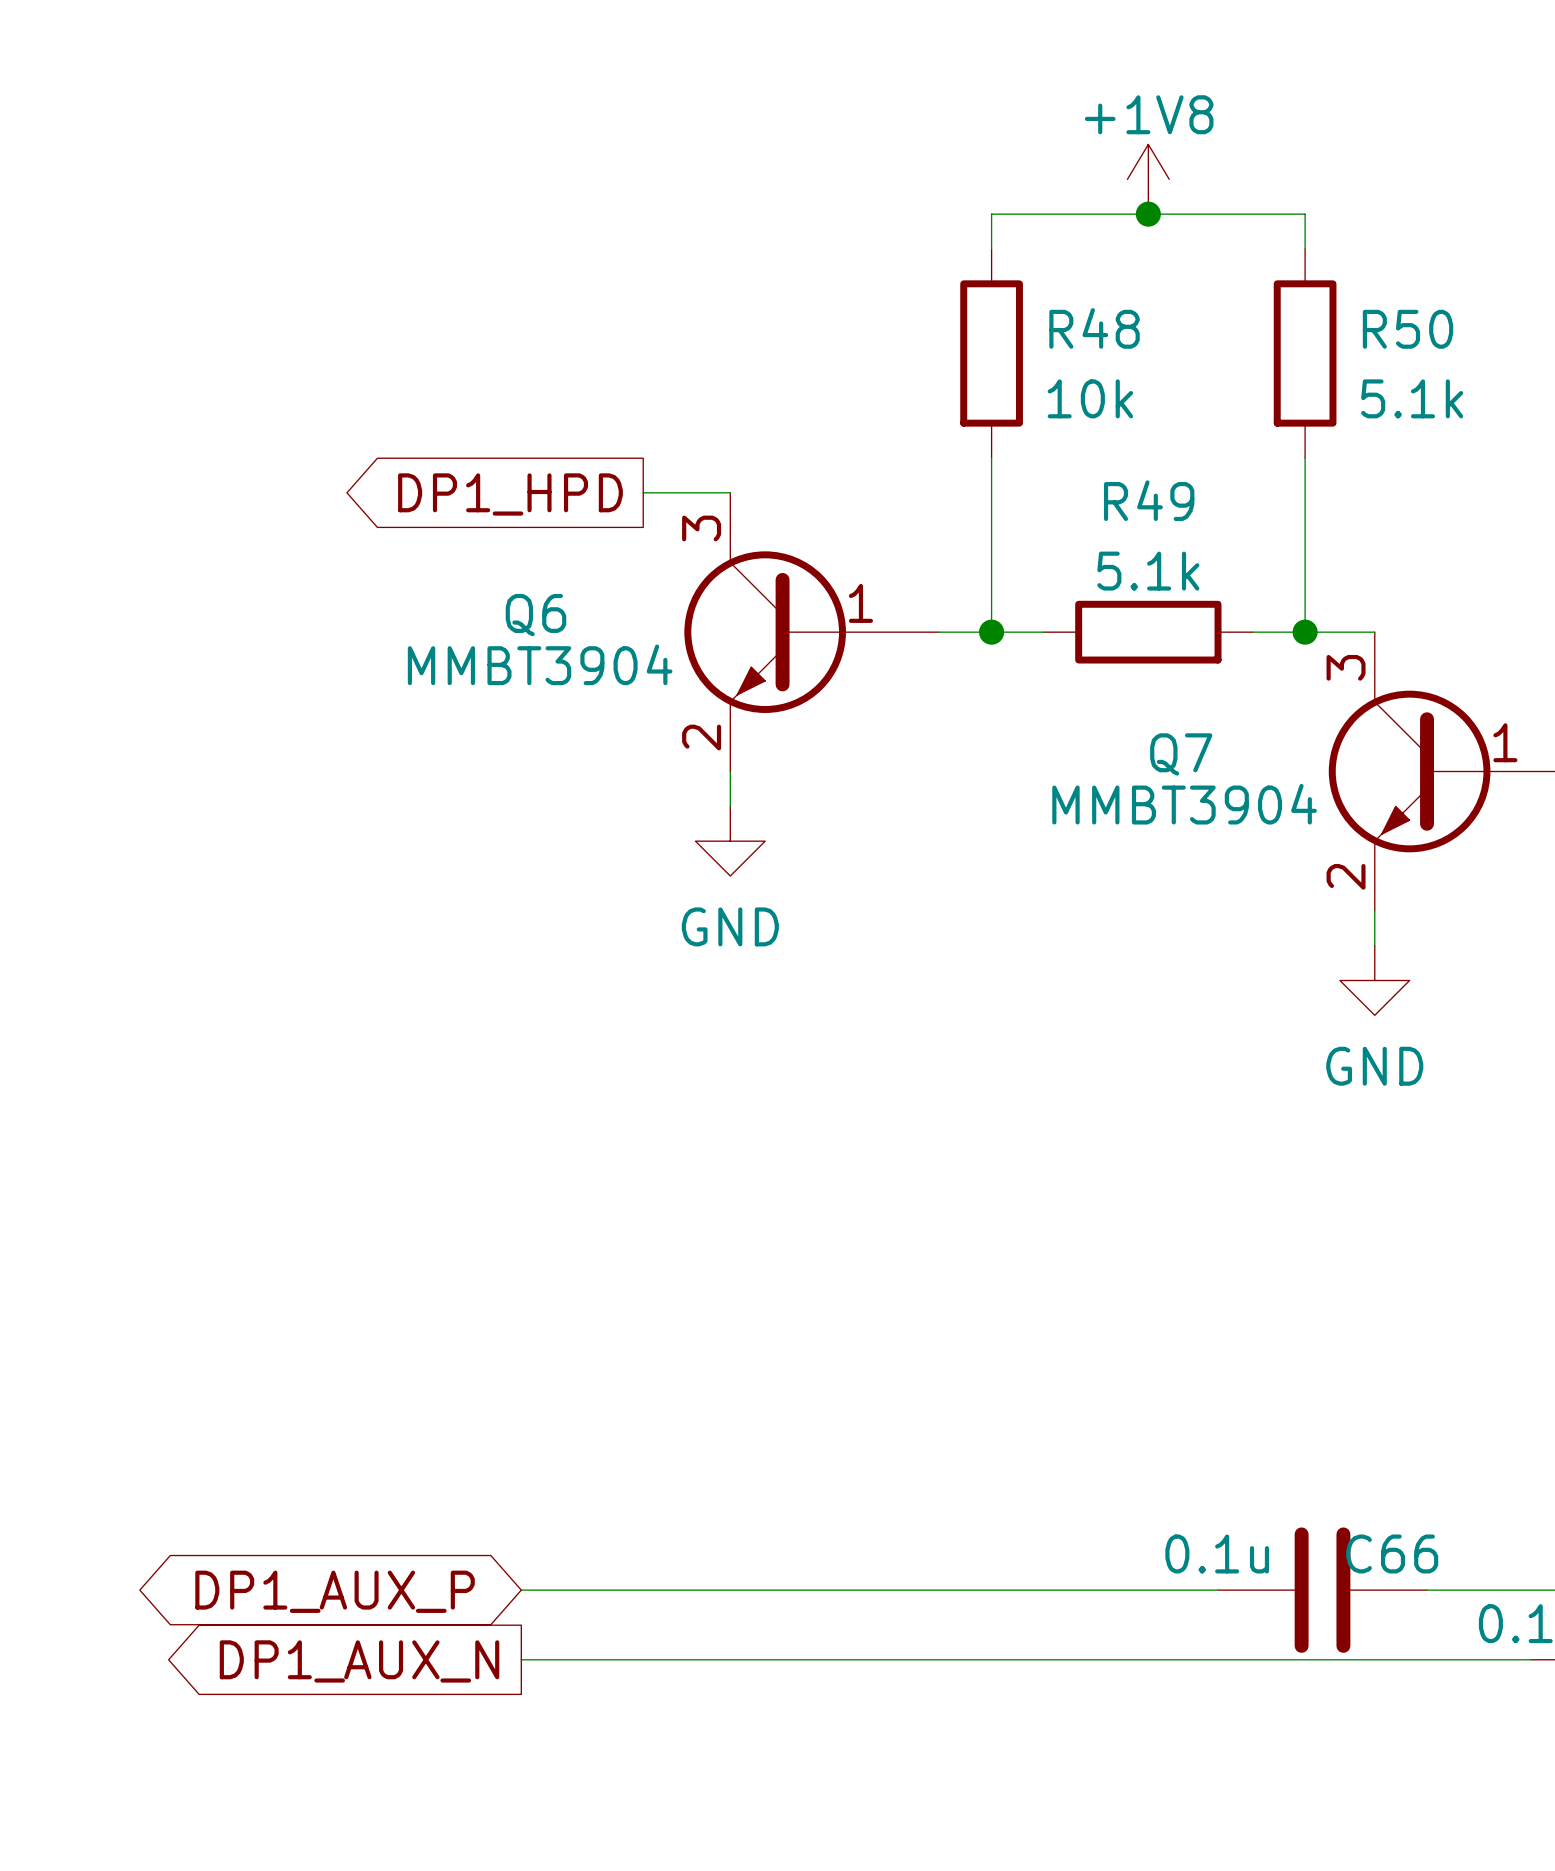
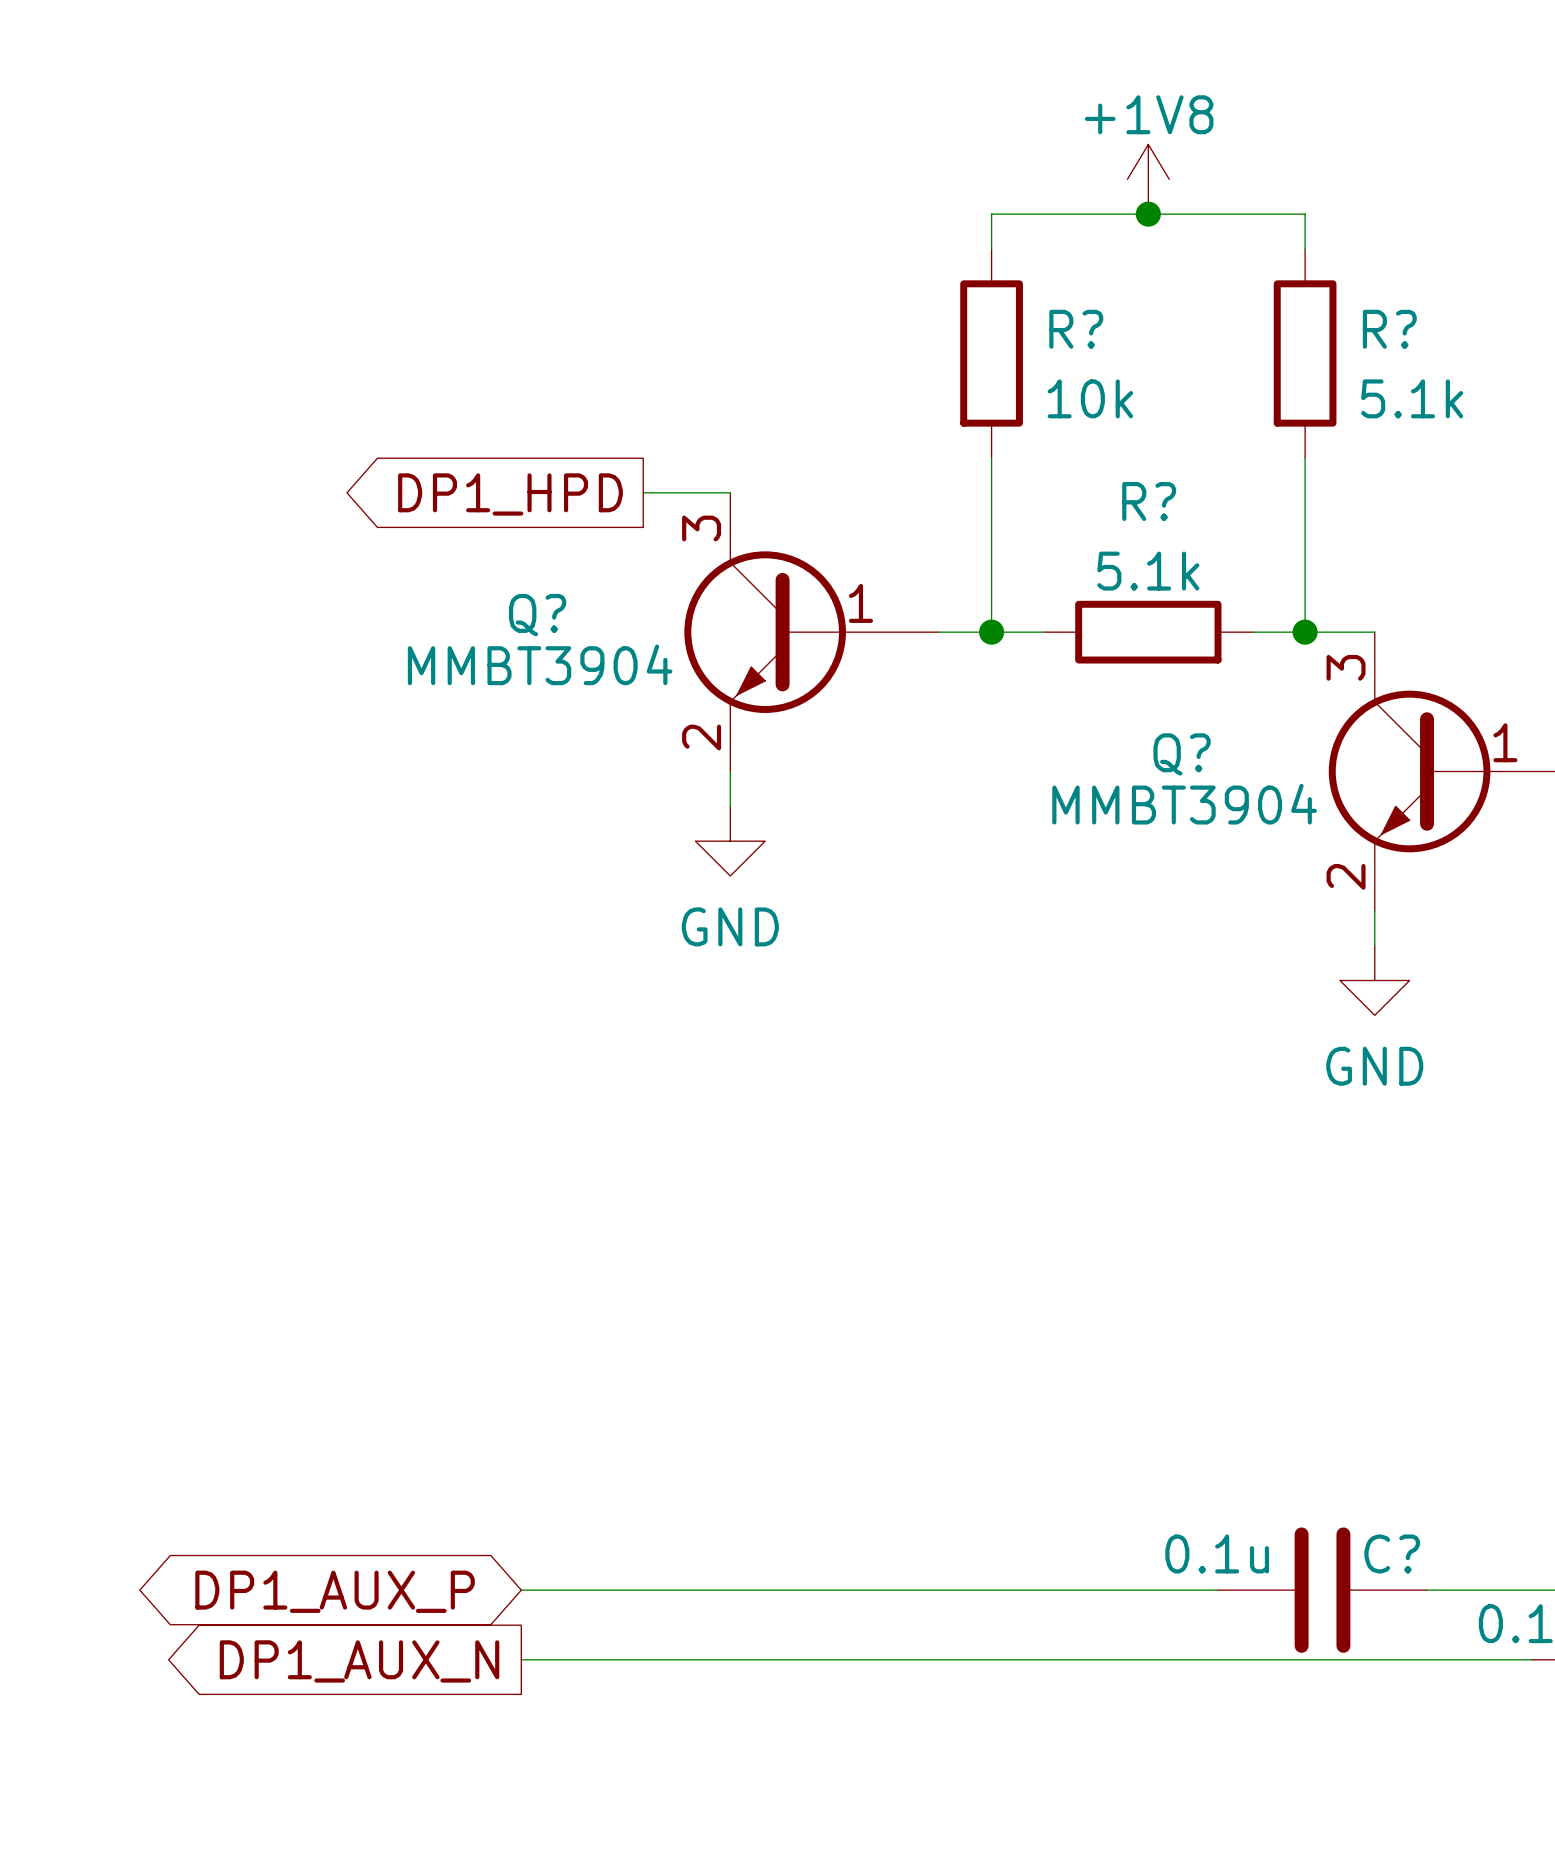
R48 name: R48 (1094, 328) -> R? (1076, 329)
R50 name: R50 (1408, 329) -> R? (1389, 329)
R49 name: R49 (1149, 500) -> R? (1149, 501)
Q6 name: Q6 (535, 615) -> Q? (537, 615)
Q7 name: Q7 (1181, 754) -> Q? (1182, 754)
C66 name: C66 (1392, 1553) -> C? (1392, 1553)

